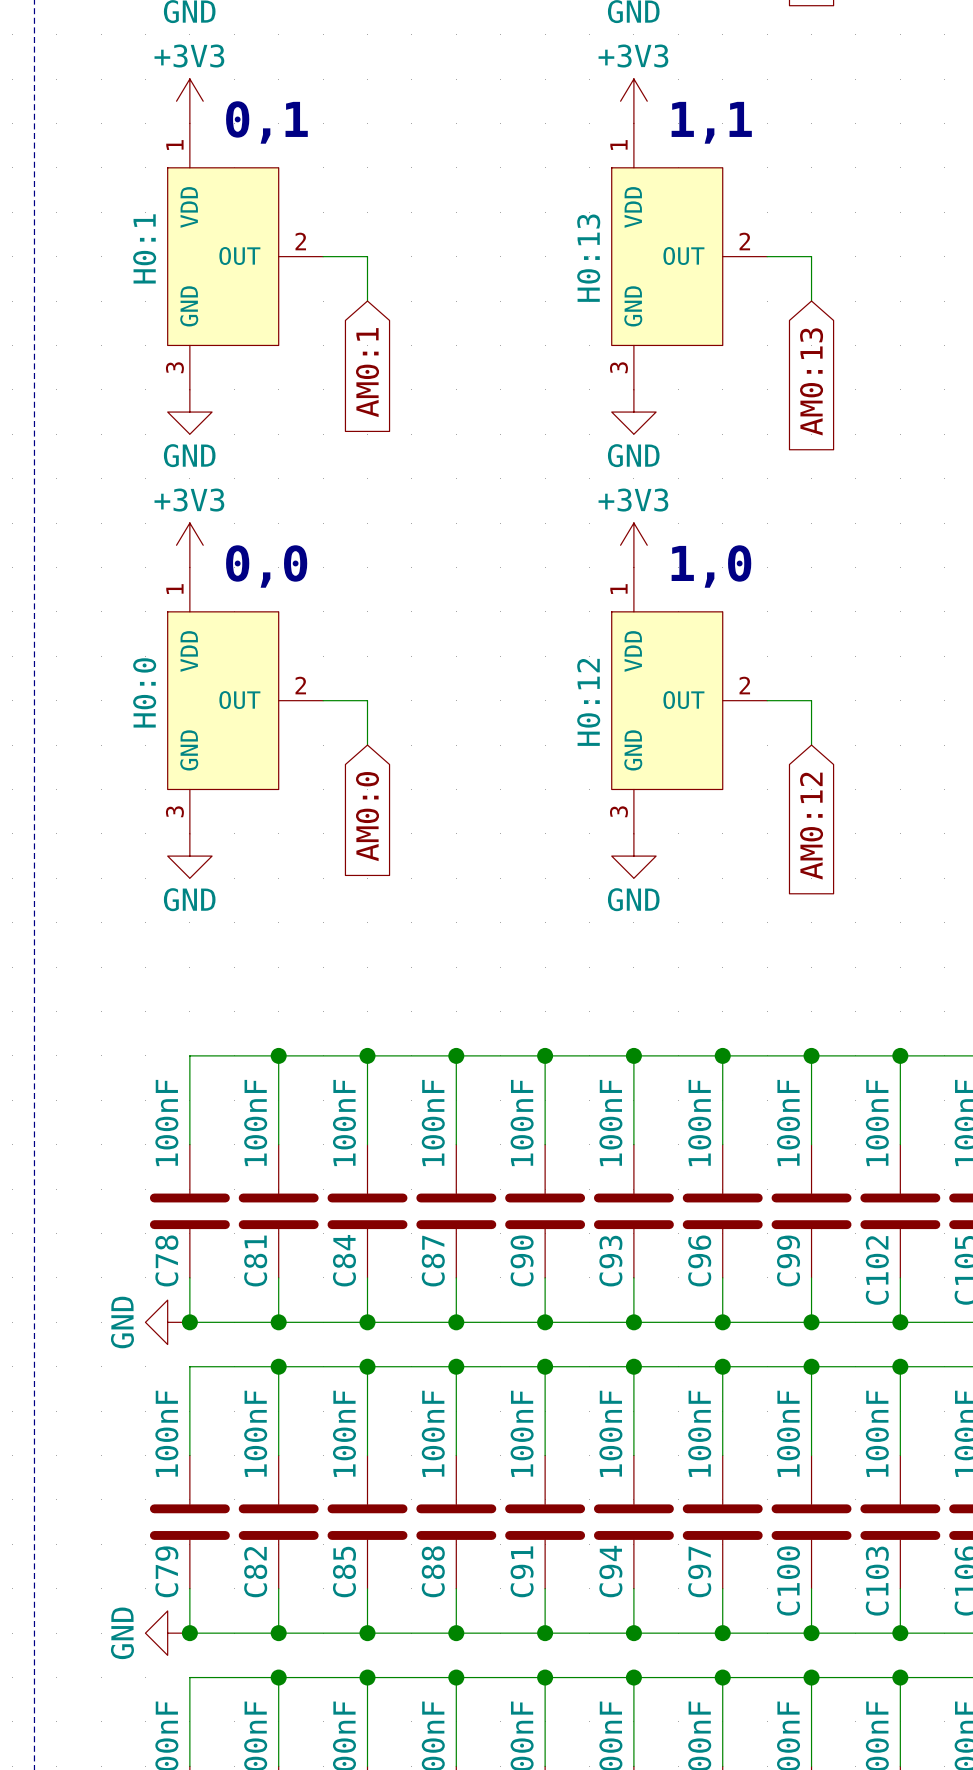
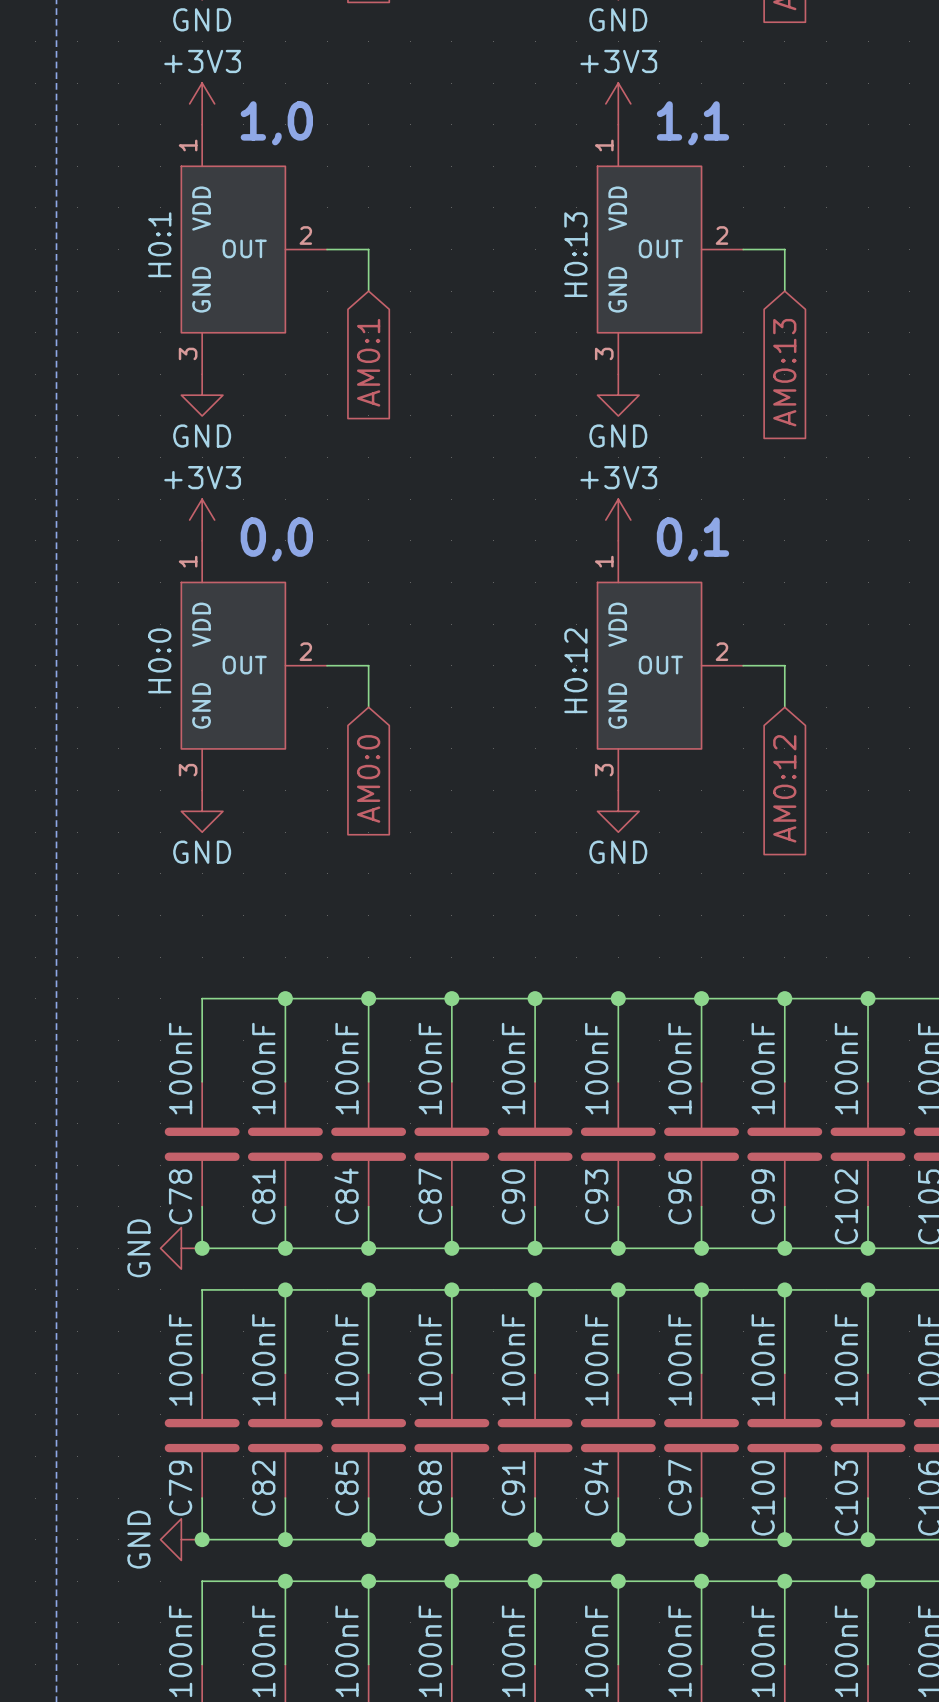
text: 0,1 (266, 122) -> 1,0 (276, 123)
text: 1,0 (711, 566) -> 0,1 (692, 539)

